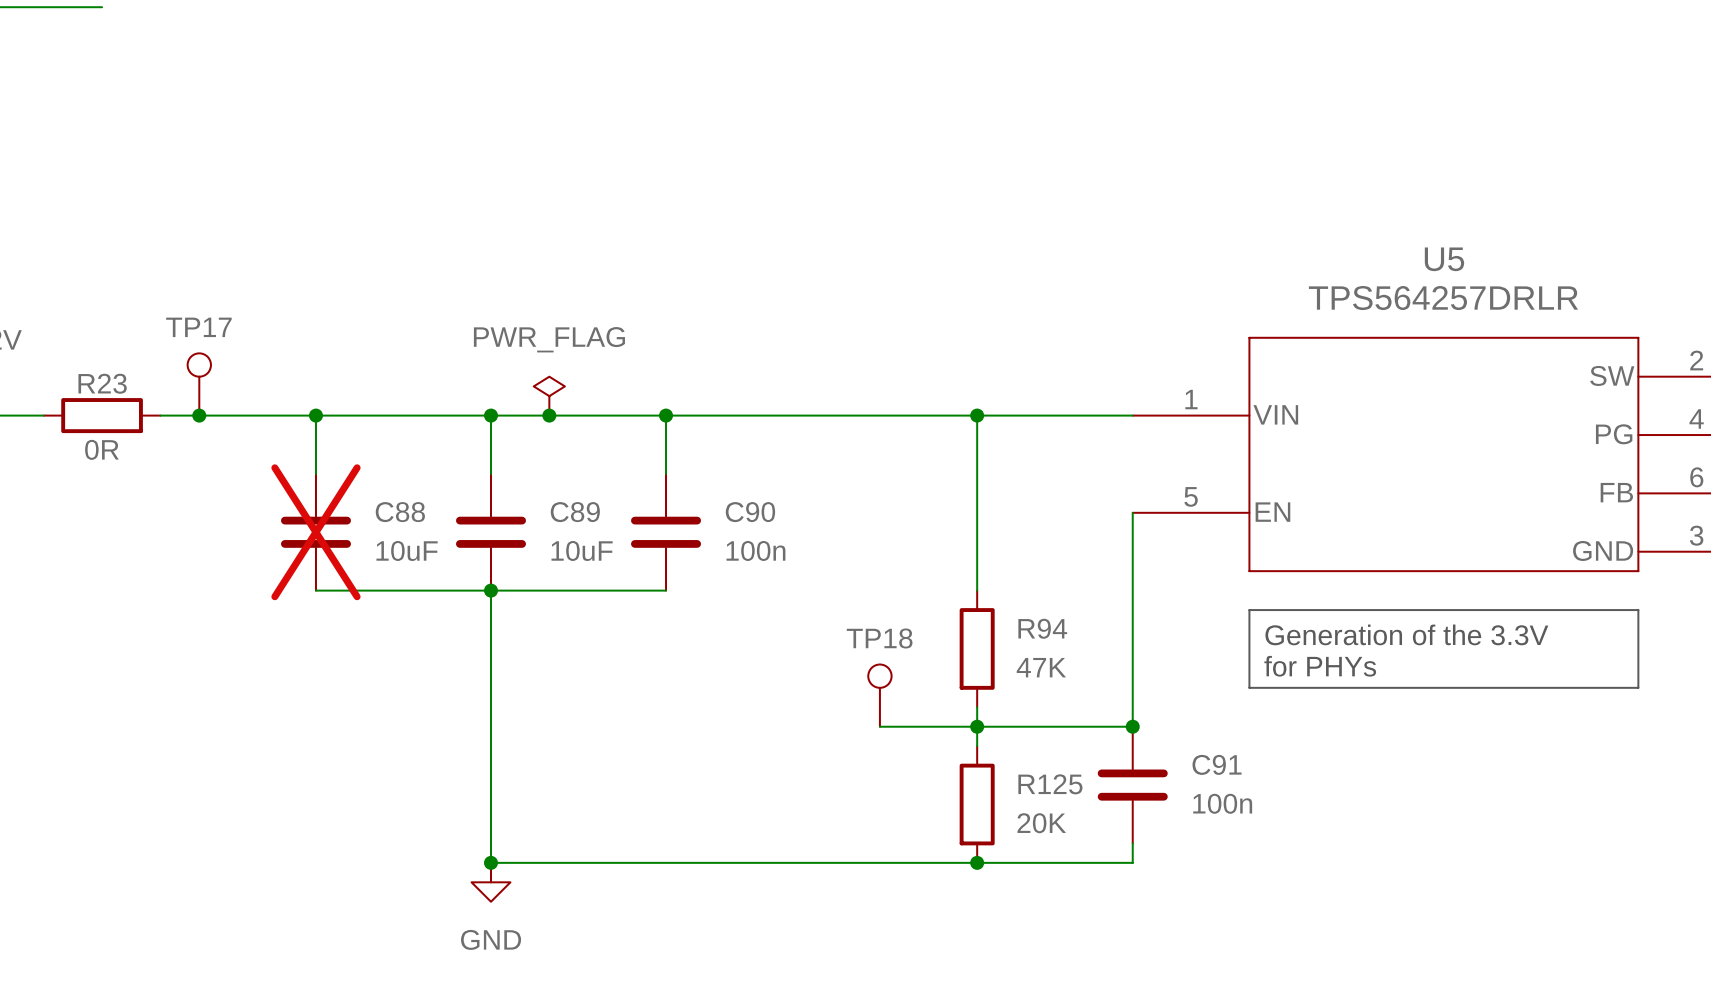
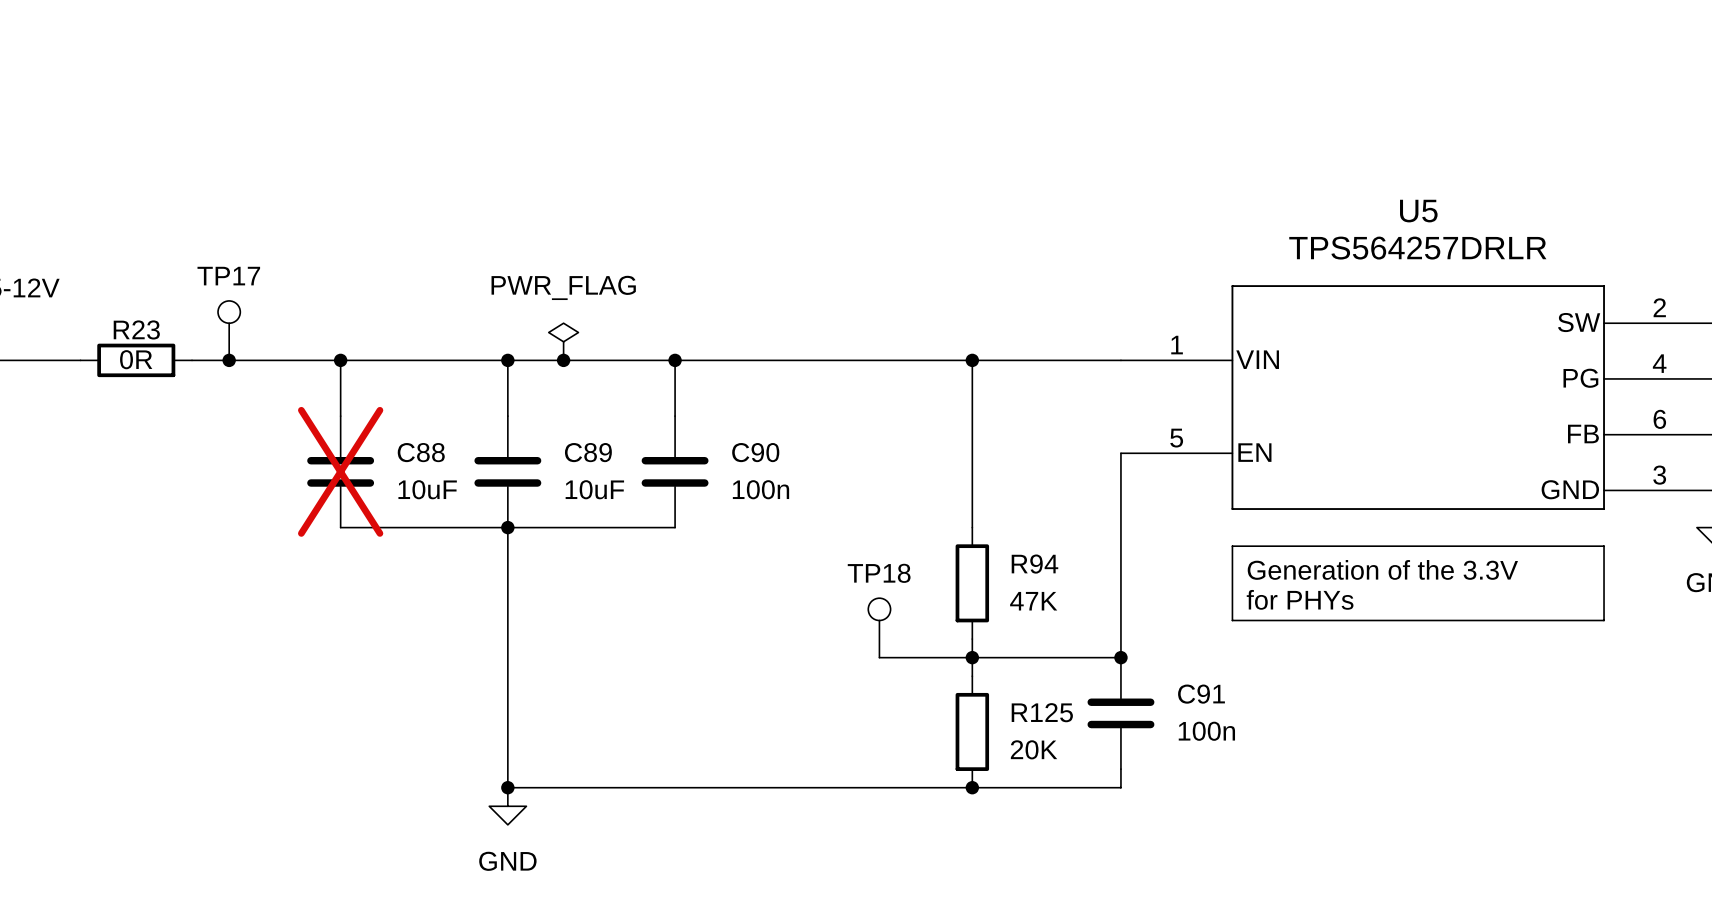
R23 value position: 0R (101, 449) -> 0R (136, 359)

